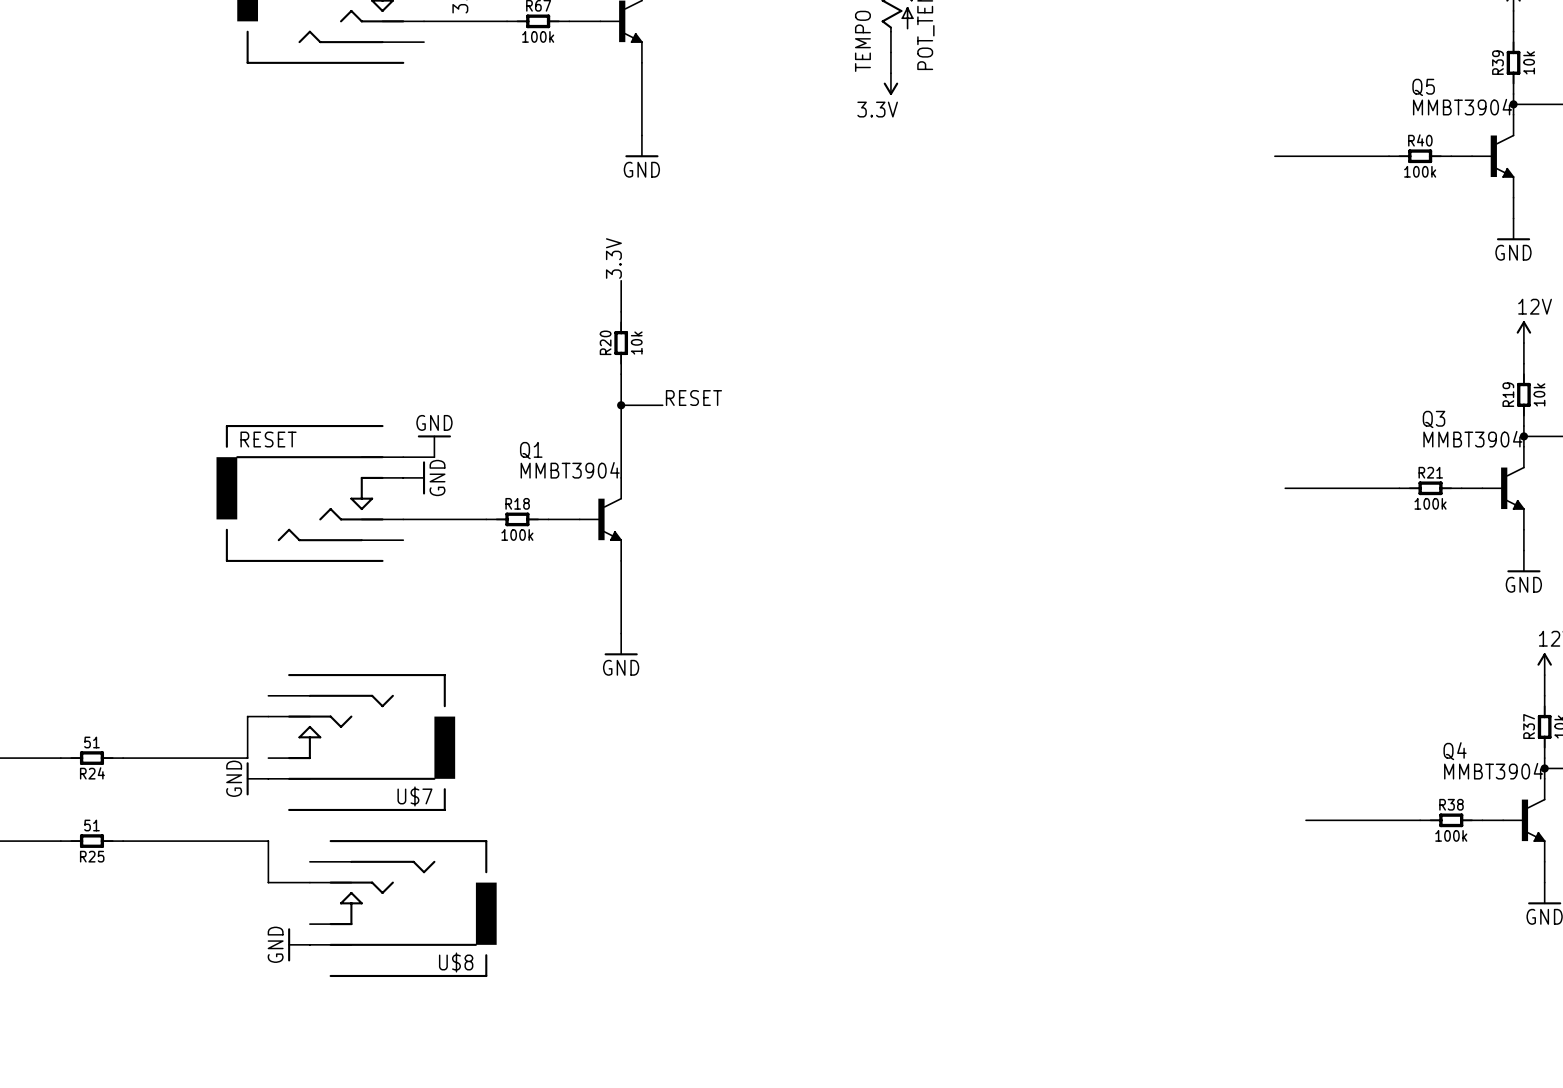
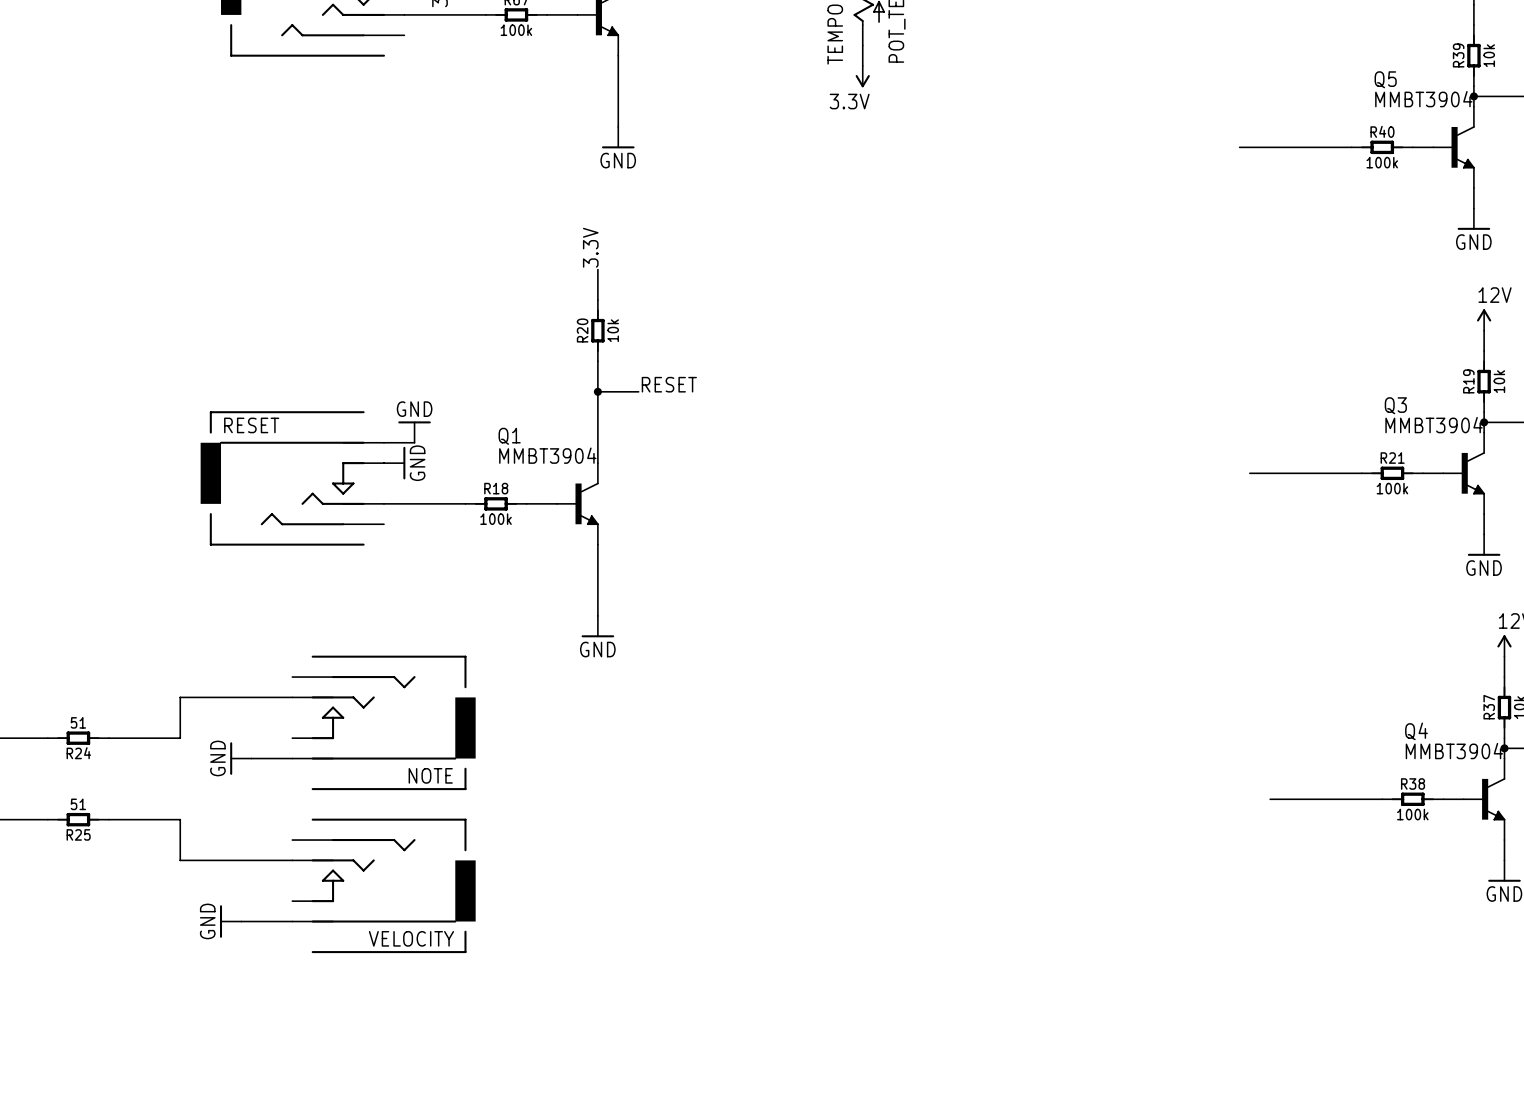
wire: (247, 716) (247, 758) (195, 758) -> (231, 697) (180, 697) (180, 738)
U$7: (361, 742) -> none
NOTE: none -> (383, 722)
wire: (195, 841) (268, 841) (268, 882) -> (180, 819) (180, 860) (251, 860)
wire: none -> (241, 921) (292, 921)
power symbol position: GND (298, 944) -> GND (230, 921)
U$8 name: U$8 (456, 962) -> VELOCITY (411, 938)

